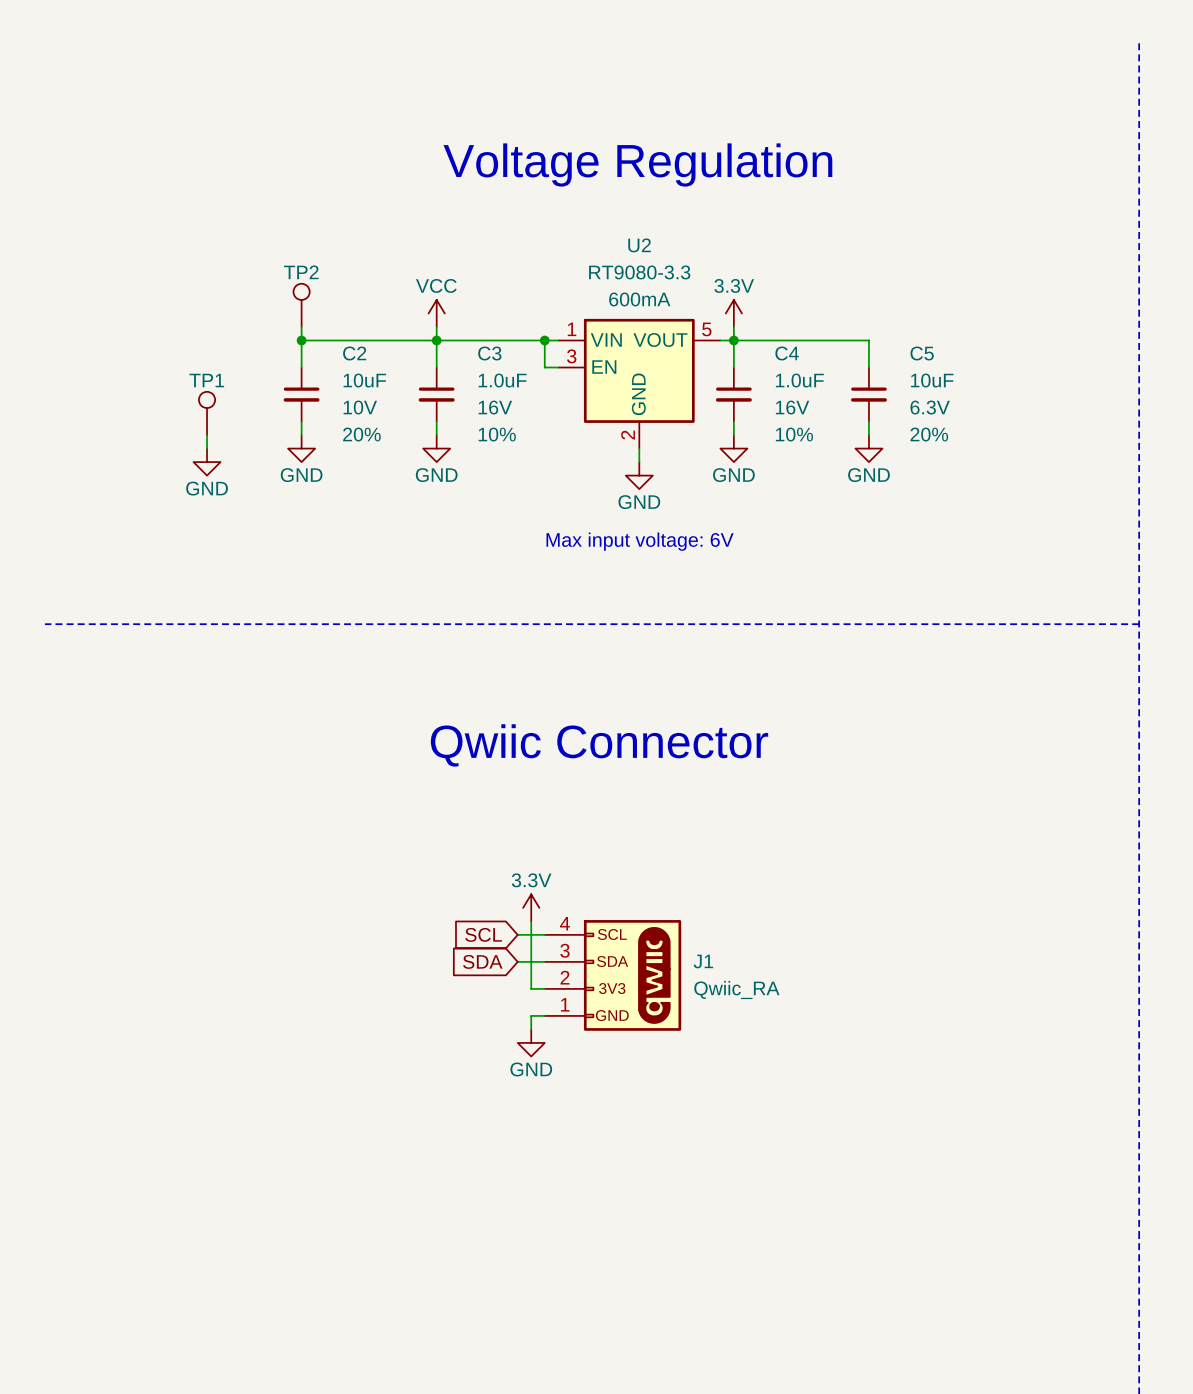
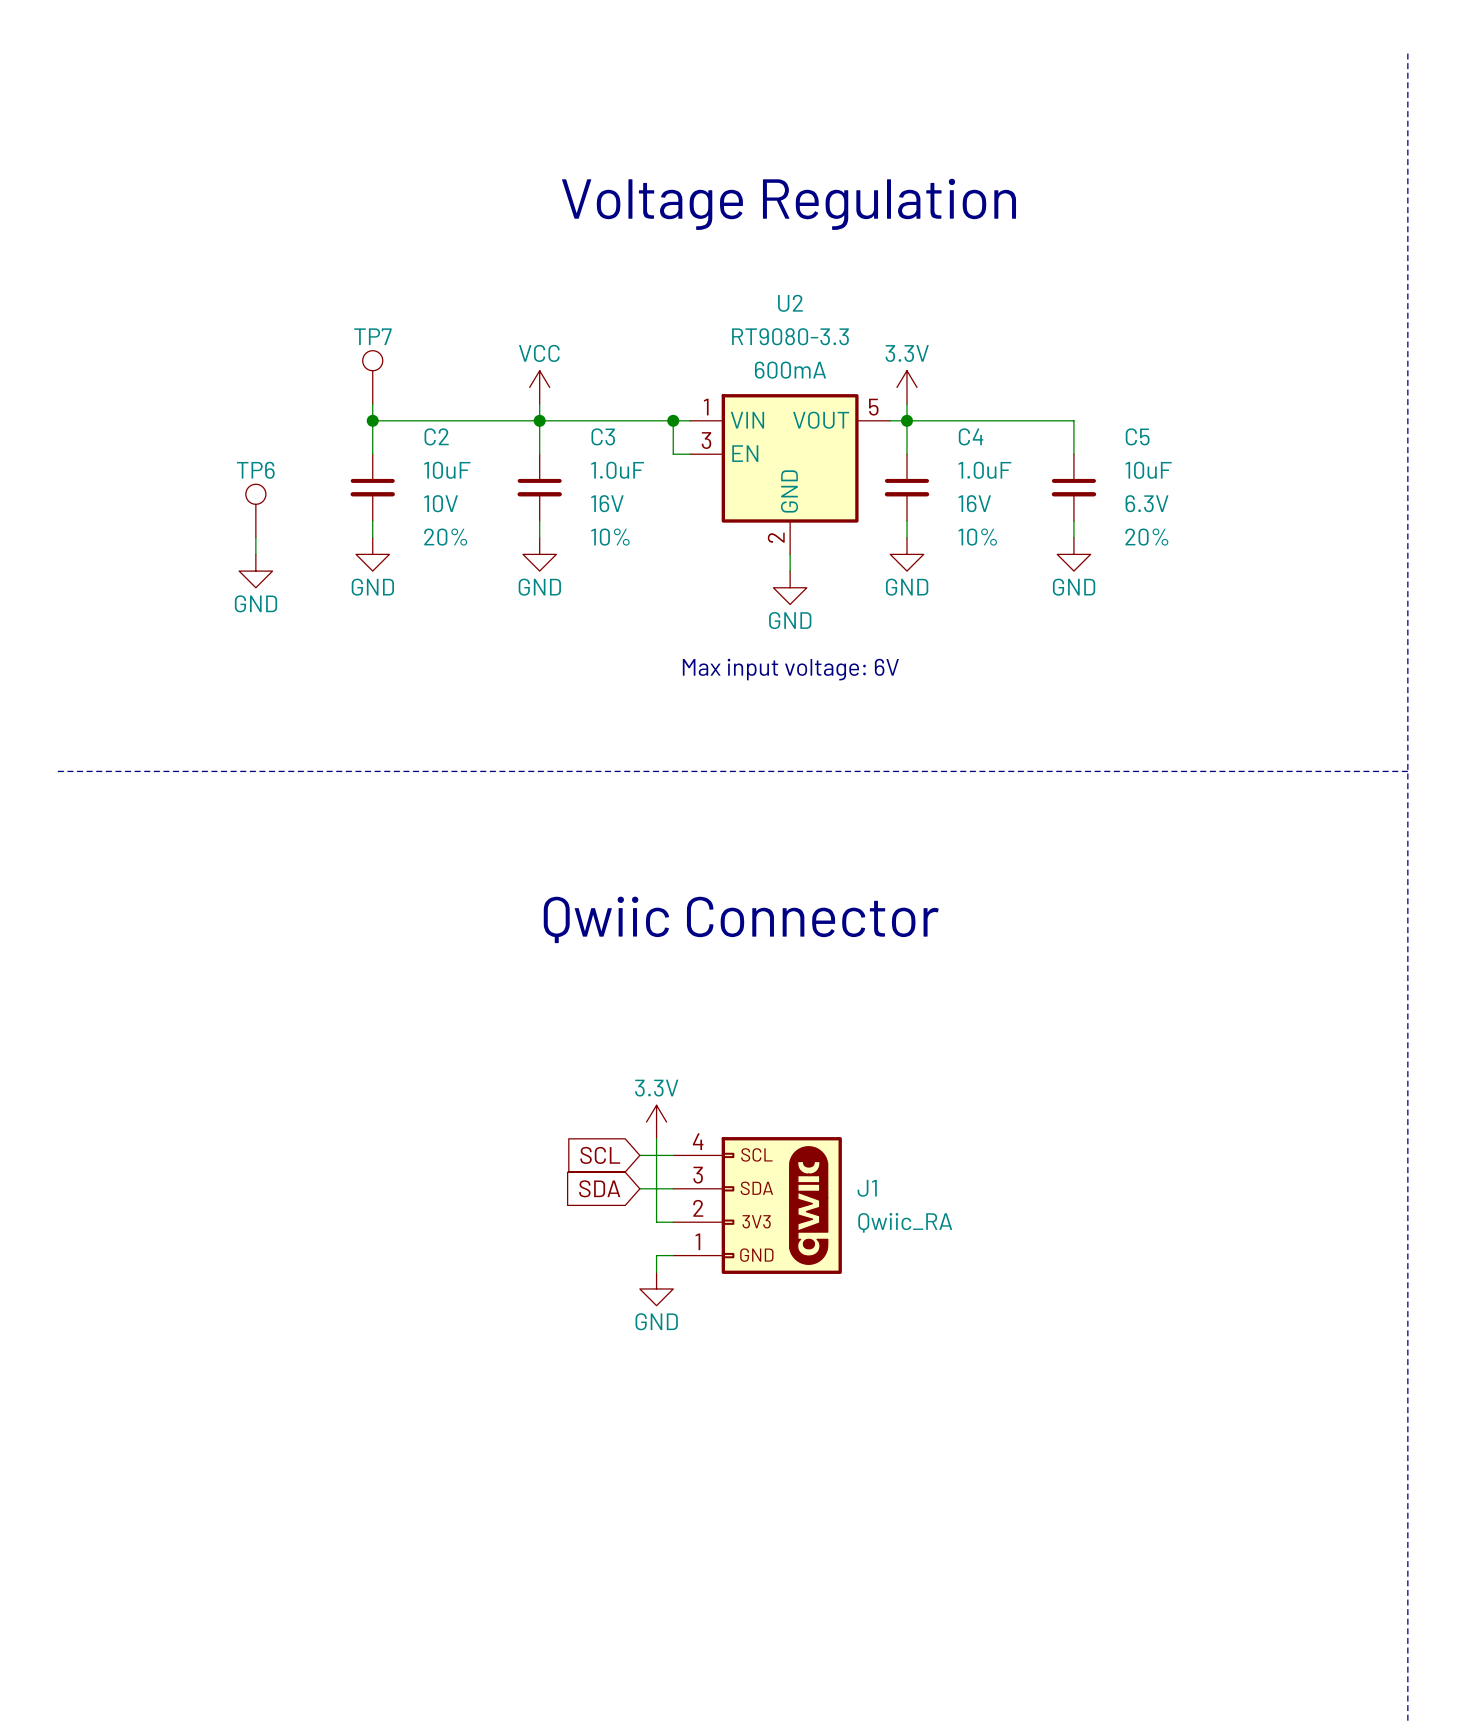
TP2 name: TP2 (301, 272) -> TP7 (372, 336)
TP1 name: TP1 (206, 380) -> TP6 (255, 470)

